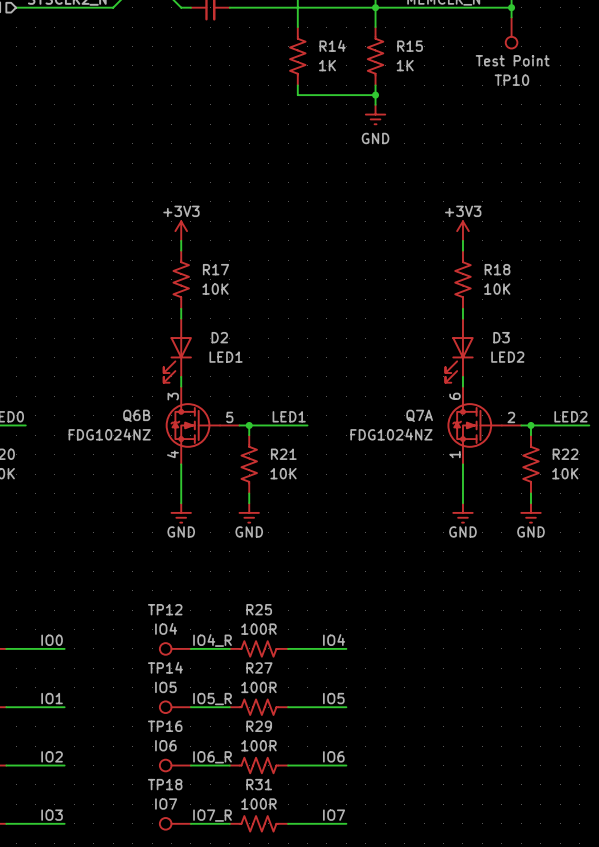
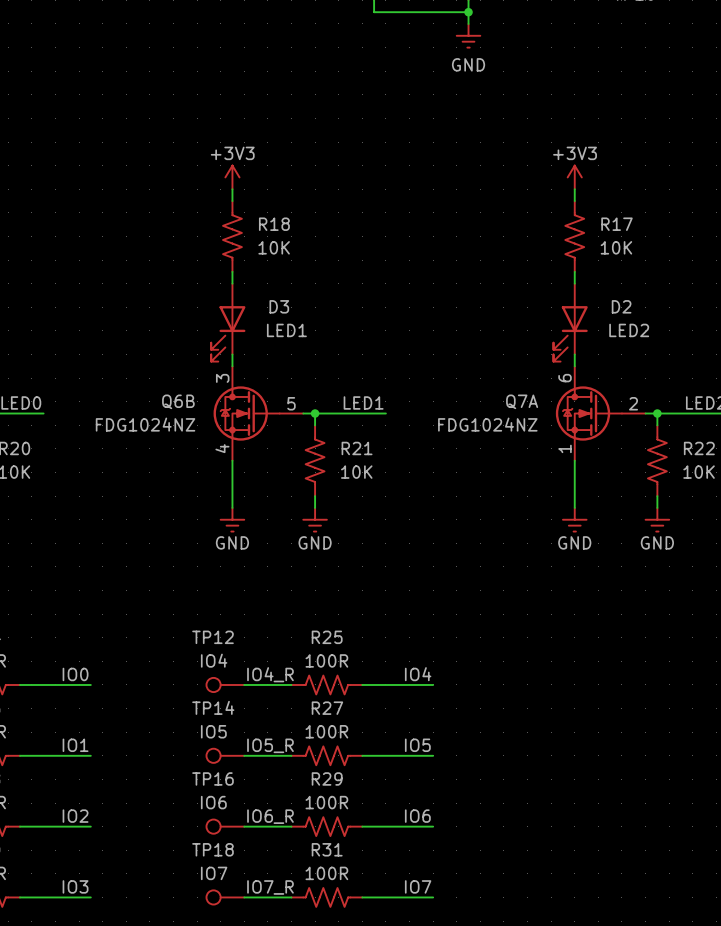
R17 name: R17 (215, 269) -> R18 (274, 224)
R18 name: R18 (497, 269) -> R17 (616, 224)
D2 name: D2 (219, 337) -> D3 (279, 306)
D3 name: D3 (501, 337) -> D2 (621, 306)

